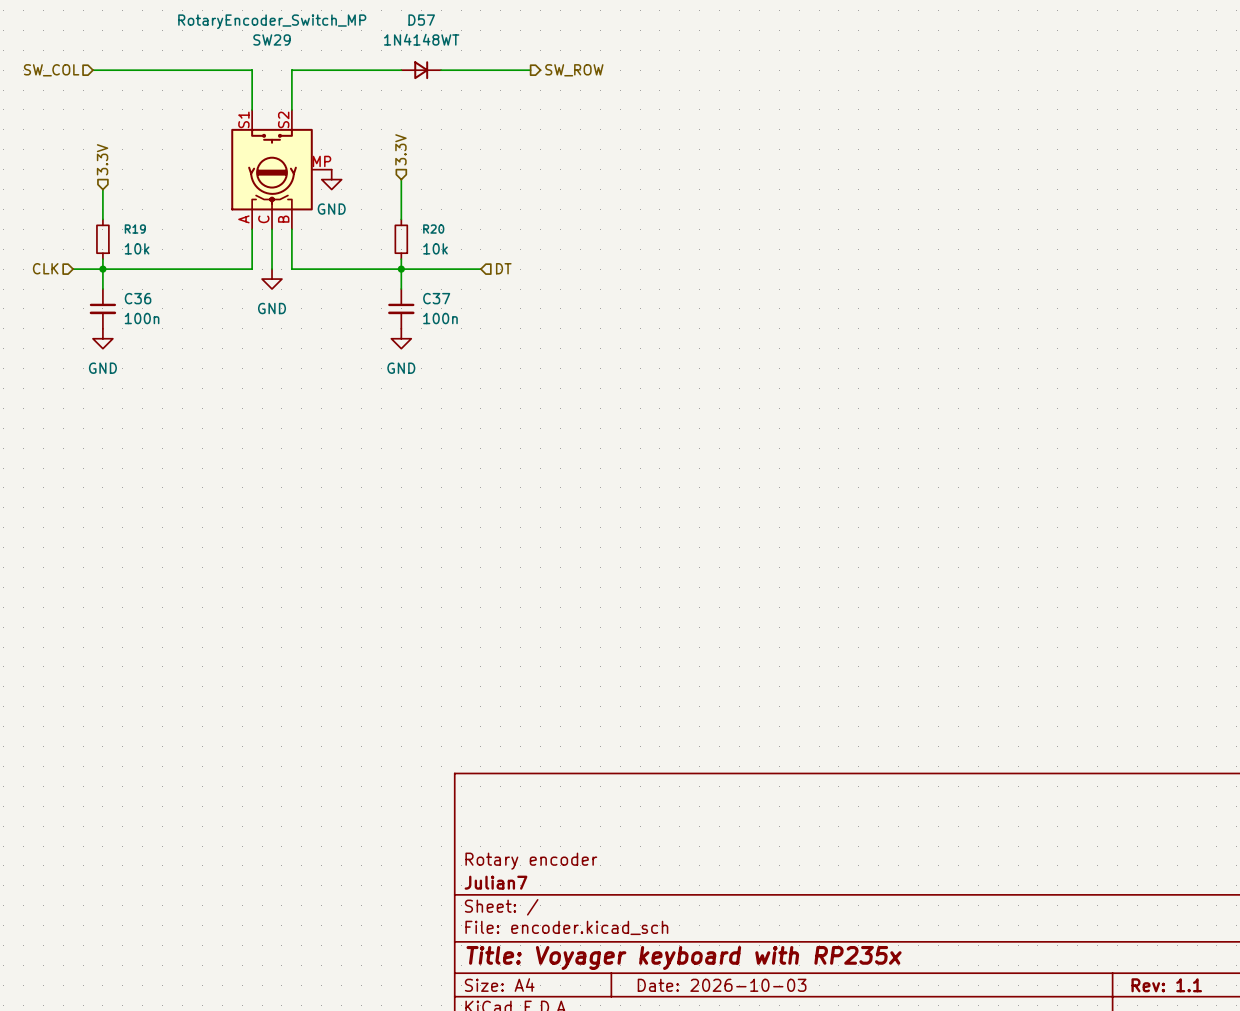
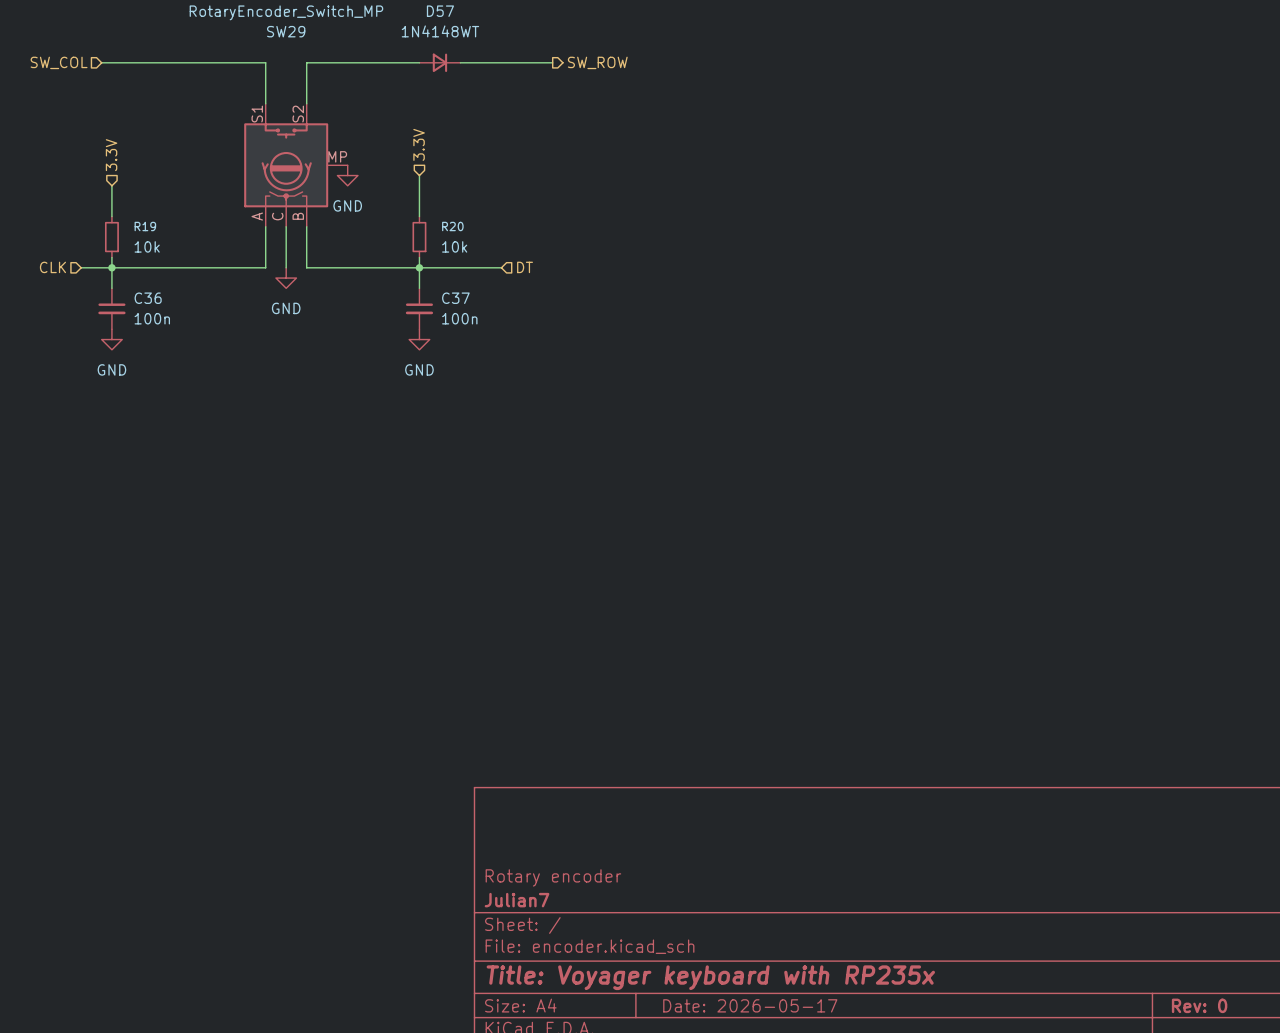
title block: Date: 2026-10-03 (722, 985) -> Date: 2026-05-17 (750, 1005)
title block: Rev: 1.1 (1166, 985) -> Rev: 0 (1199, 1005)

